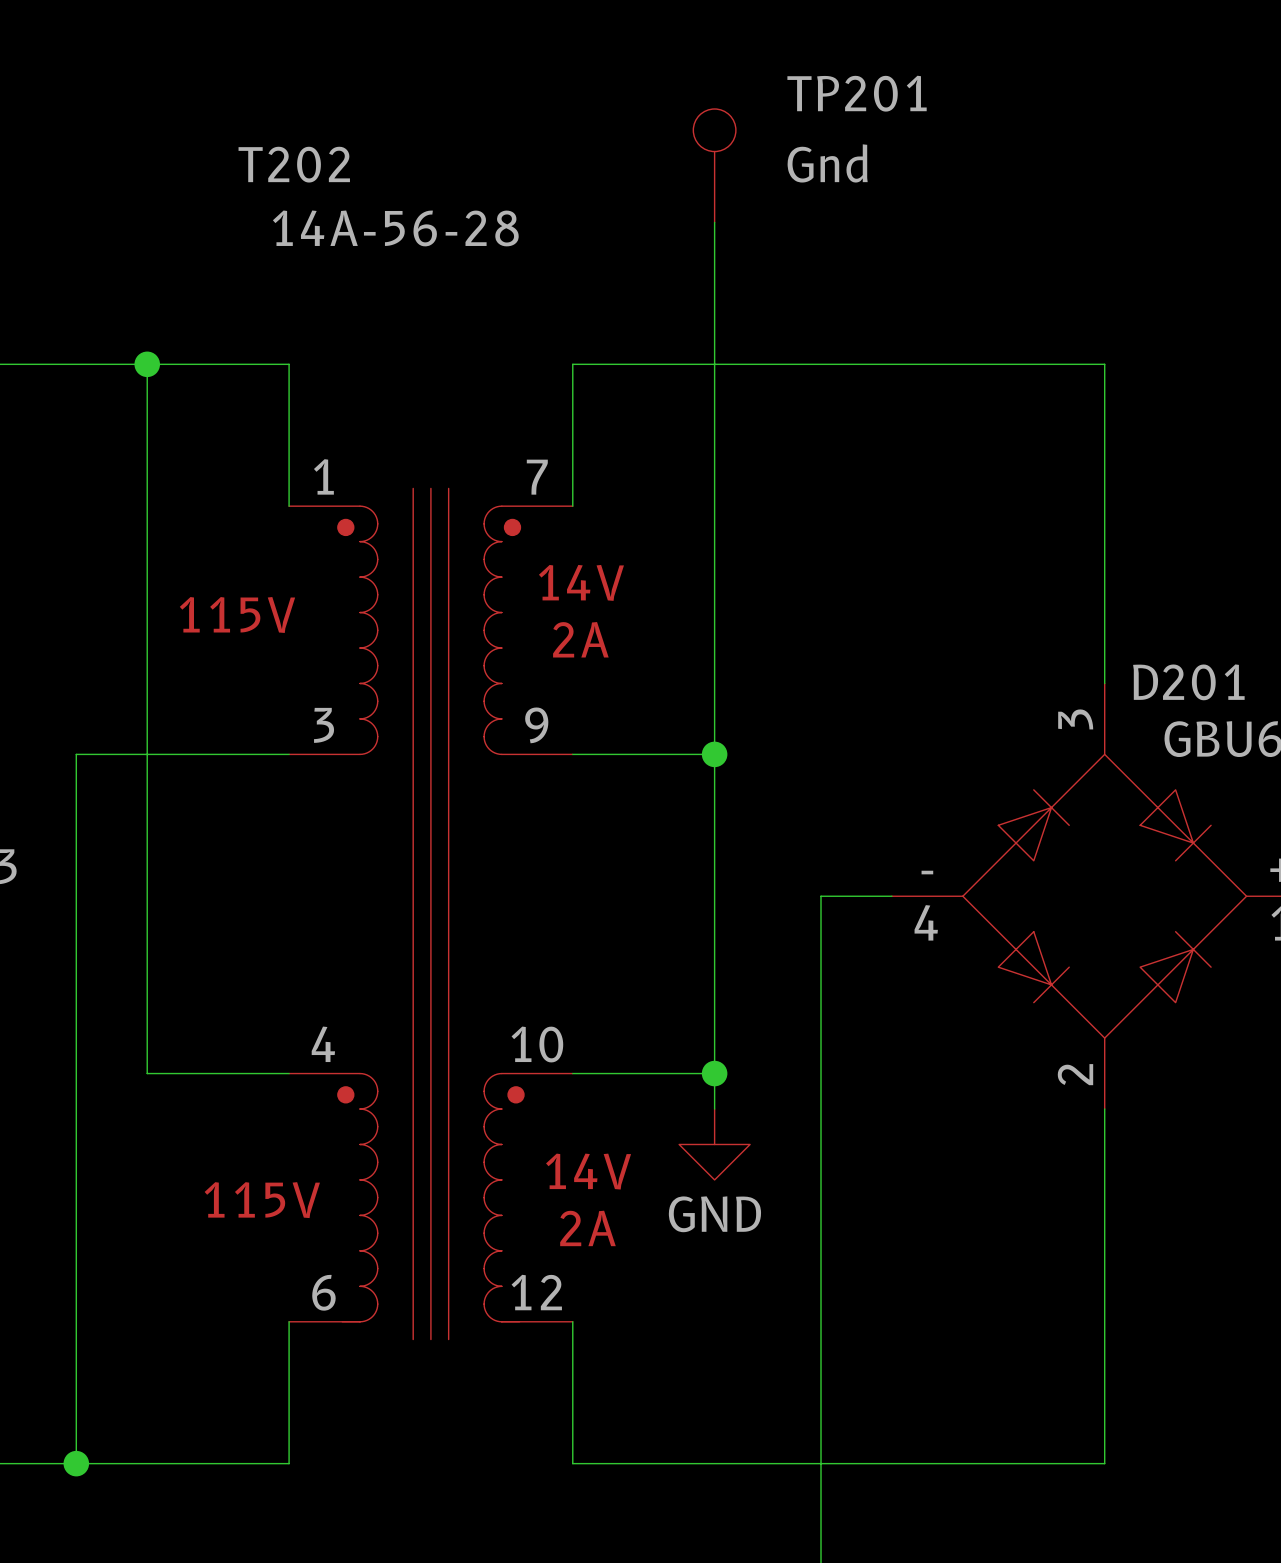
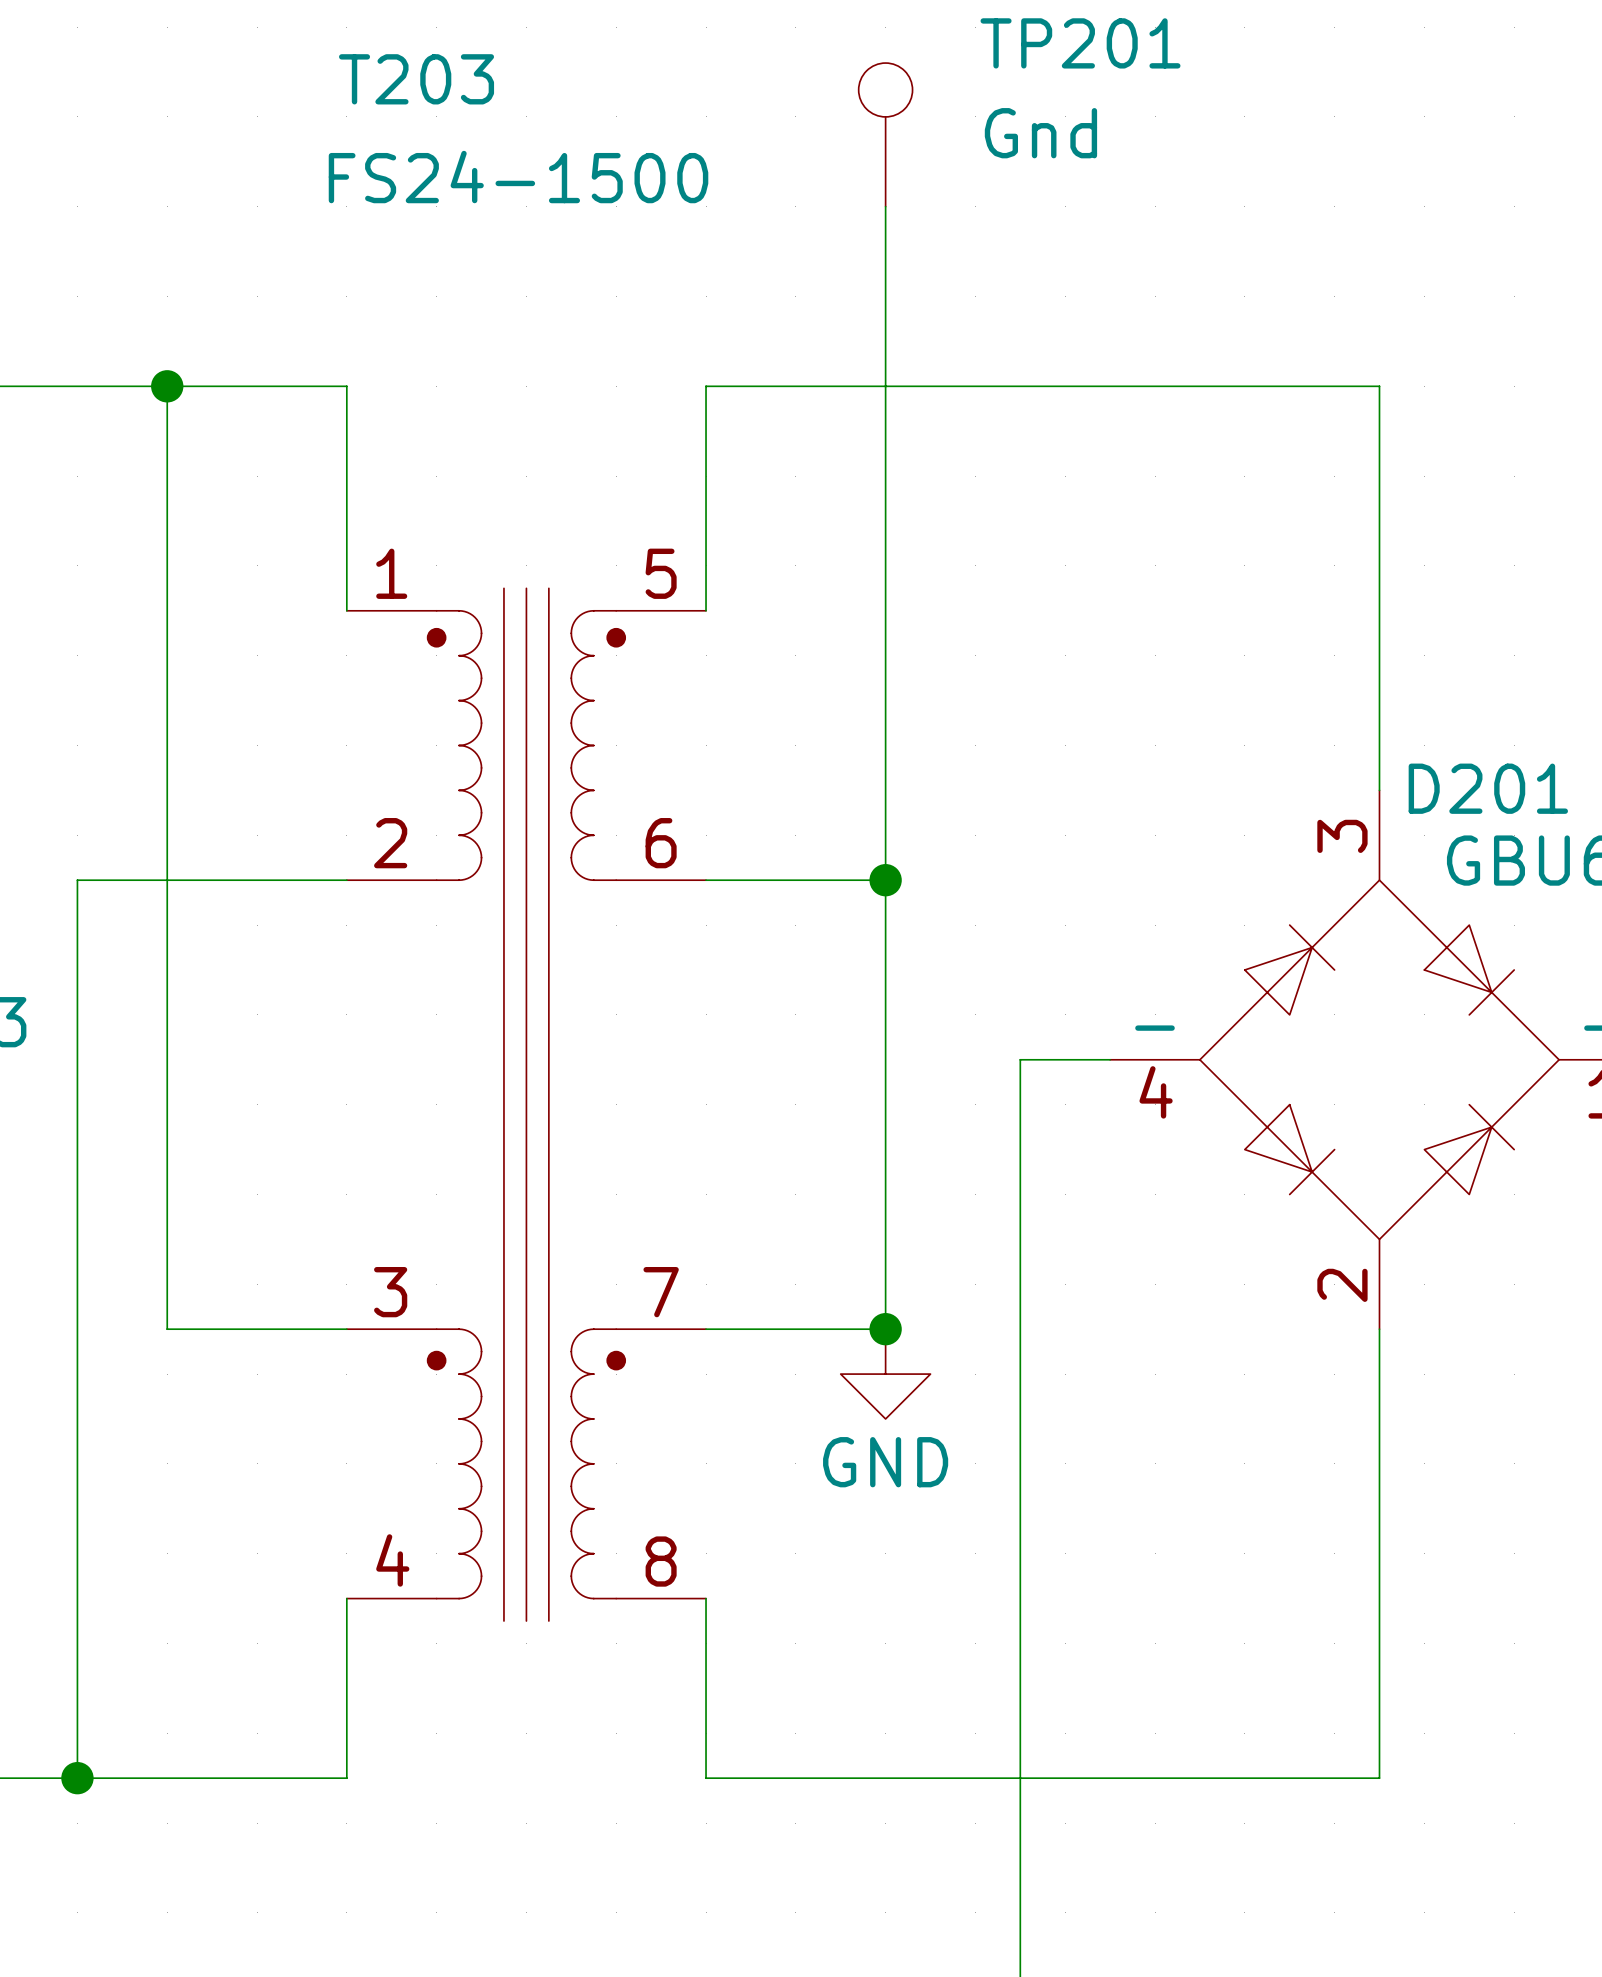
wire: none -> (346, 565) (346, 610)
wire: none -> (706, 565) (706, 610)
T202: 14A-56-28 (430, 913) -> none
T203: none -> FS24-1500 (526, 1104)
wire: (147, 1073) (289, 1073) -> (167, 1284) (167, 1329) (346, 1329)
wire: (572, 1073) (714, 1073) -> (706, 1329) (885, 1329)
junction position: (714, 1073) -> (885, 1329)

